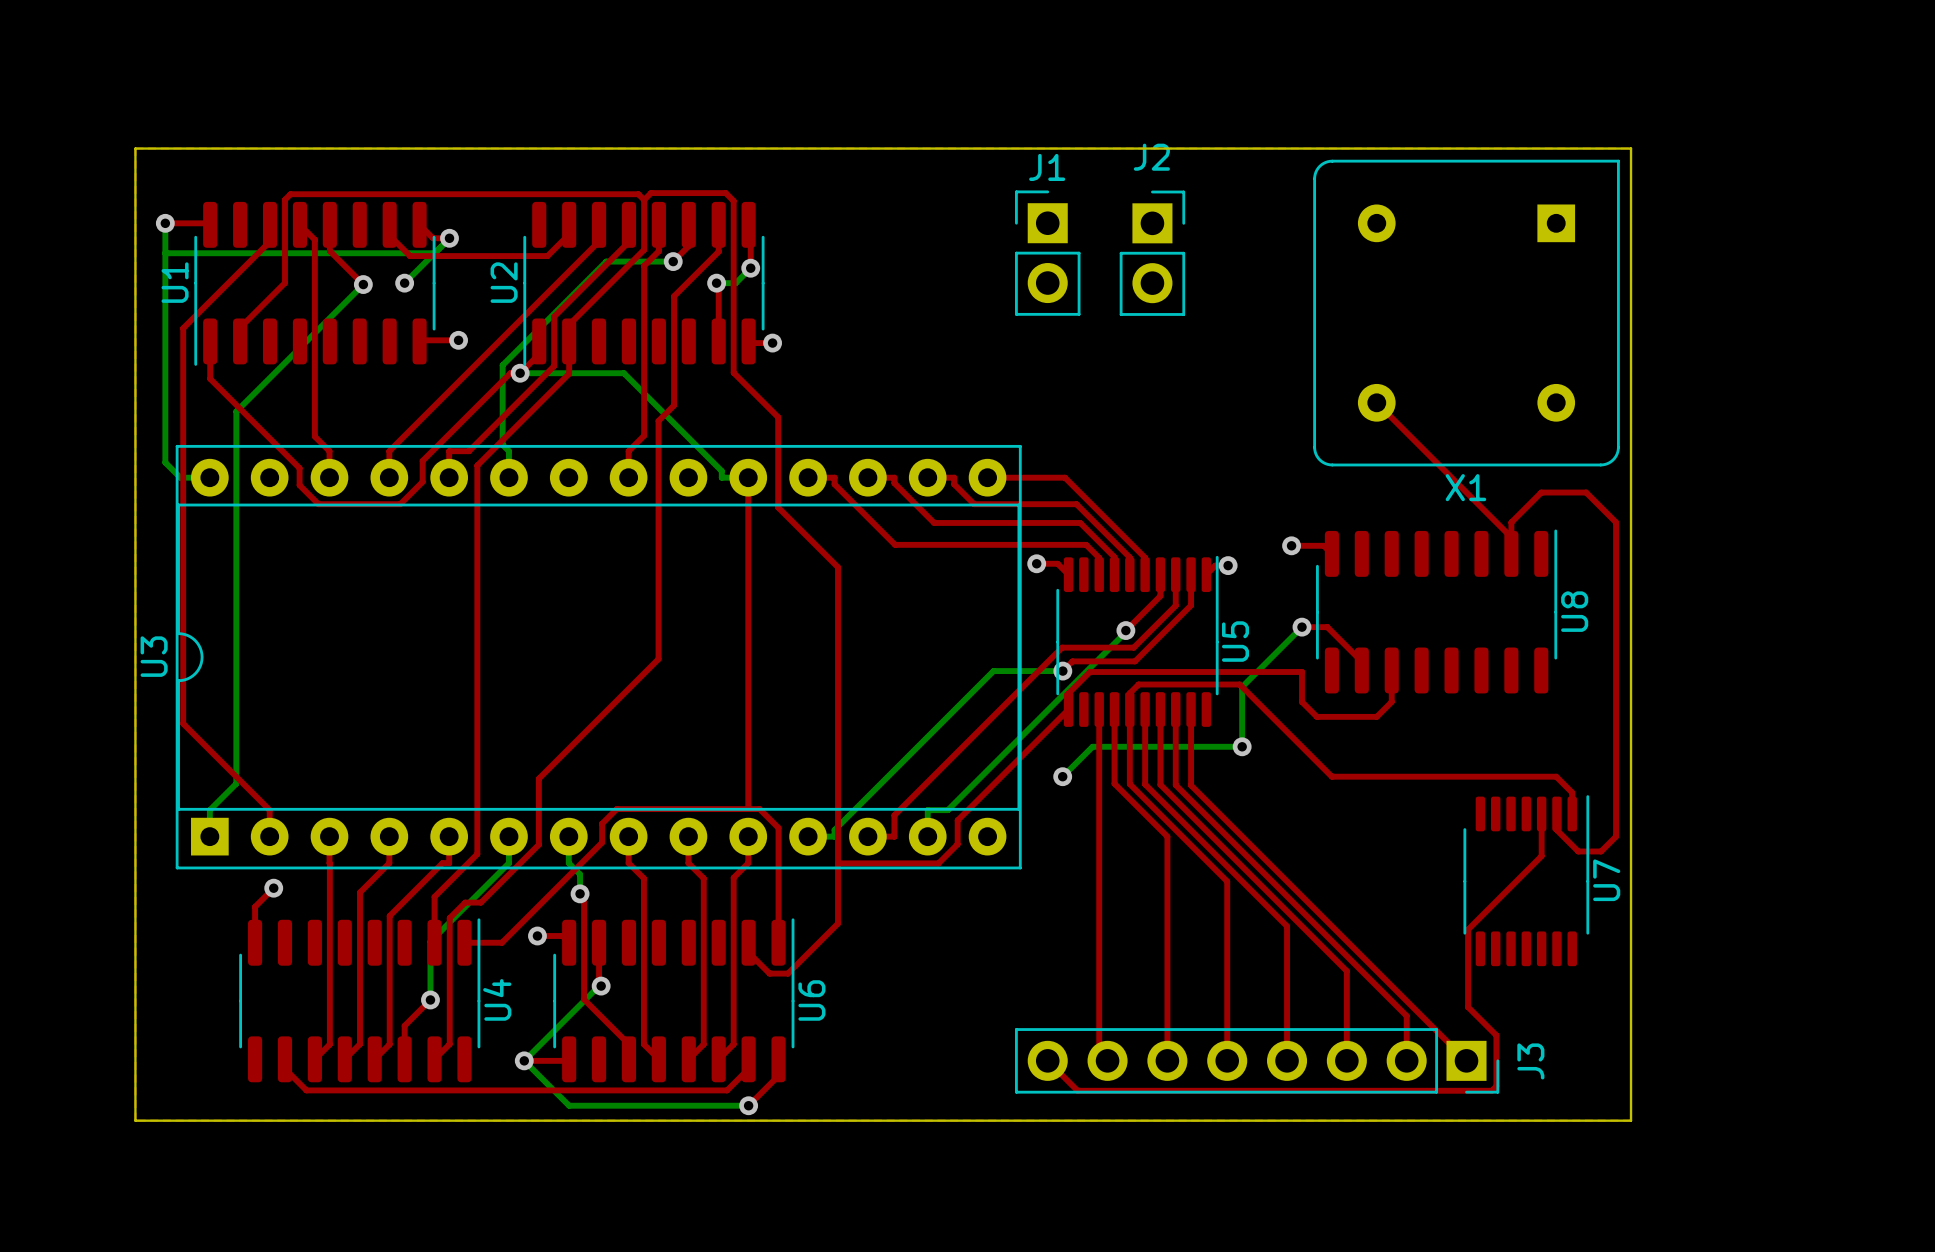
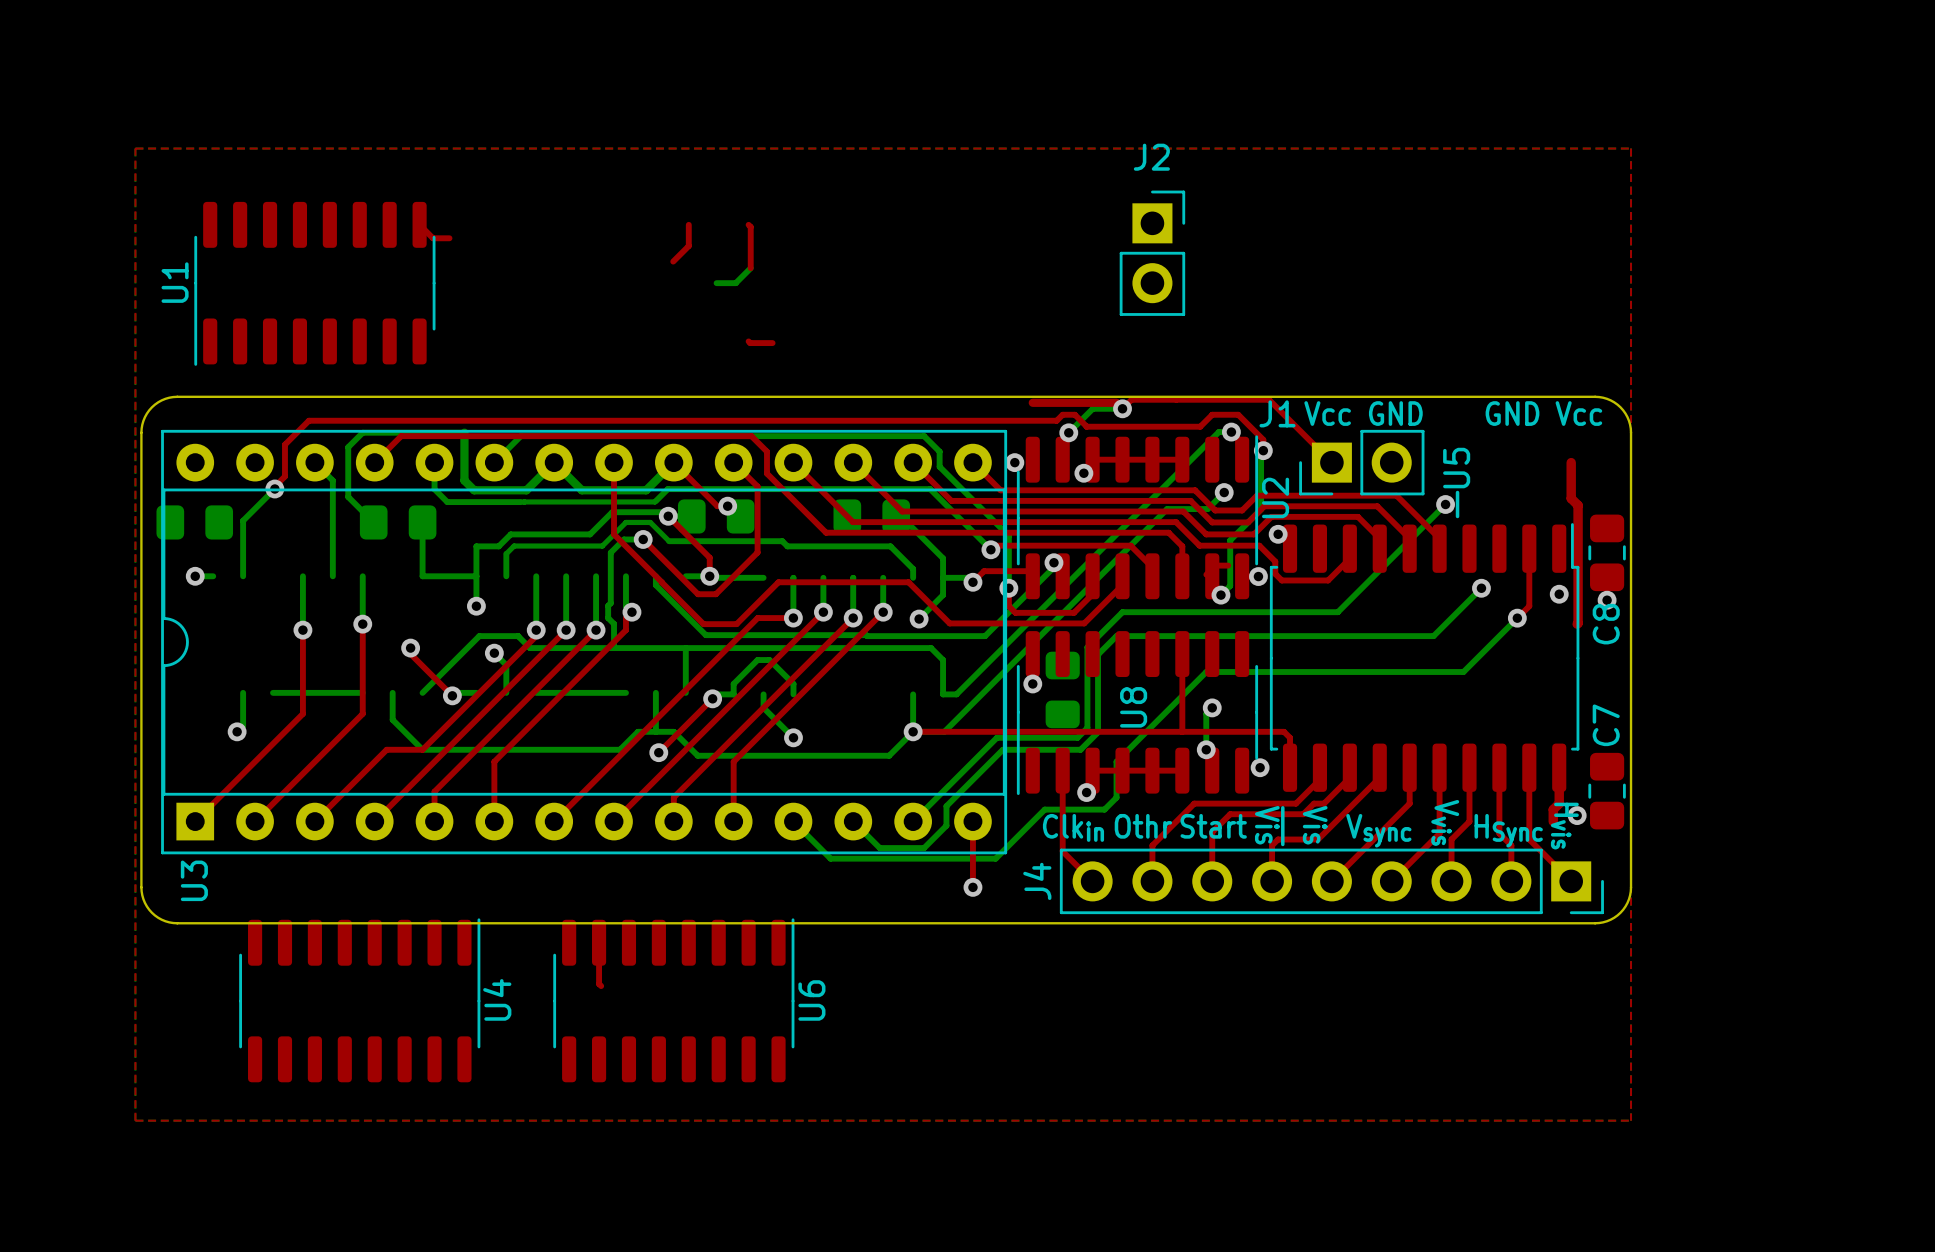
J1 name position: J1 (1047, 167) -> J1 (1277, 413)
top track: (644, 199) (644, 249) (569, 324) (569, 373) (477, 465) (477, 854) (434, 896) (434, 942) -> none
top track: (644, 199) (651, 193) (725, 193) (733, 200) (733, 372) (778, 417) (778, 507) (838, 567) (838, 923) (787, 973) (769, 973) (748, 952) (748, 942) -> none
top track: (644, 199) (638, 194) (290, 194) (284, 199) (284, 282) (240, 327) (240, 341) -> none
top track: (165, 223) (210, 224) -> none
bottom track: (165, 223) (165, 462) (180, 477) (209, 477) -> none
via: (165, 223) -> none
top track: (270, 224) (270, 241) (183, 328) (183, 723) (269, 810) (269, 836) -> none
top track: (299, 224) (314, 239) (314, 436) (329, 451) (329, 477) -> none
top track: (329, 224) (329, 251) (363, 284) -> none
top track: (389, 224) (389, 235) (410, 256) (547, 256) (569, 234) (569, 224) -> none
top track: (599, 224) (599, 241) (389, 451) (389, 477) -> none
top track: (628, 224) (628, 241) (554, 316) (554, 366) (469, 451) (449, 451) (449, 477) -> none
top track: (658, 224) (658, 251) (644, 265) (644, 435) (628, 451) (628, 477) -> none
top track: (718, 224) (718, 251) (674, 296) (674, 405) (658, 420) (658, 659) (538, 778) (538, 844) (480, 902) (465, 902) (449, 918) (449, 1044) (434, 1059) -> none
bottom track: (449, 238) (404, 283) -> none
via: (449, 238) -> none
bottom track: (165, 253) (434, 253) -> none
J1 rotation: 0° (1047, 253) -> 90° counterclockwise (1361, 462)
J1 position: (1047, 253) -> (1361, 462)
bottom track: (673, 261) (606, 261) (502, 365) (502, 444) (508, 451) (508, 477) -> none
via: (673, 261) -> none
via: (750, 268) -> none
via: (404, 283) -> none
U2 rotation: 0° (643, 283) -> 180° (1137, 517)
U2 position: (643, 283) -> (1137, 517)
top track: (716, 283) (718, 285) (718, 341) -> none
via: (716, 283) -> none
bottom track: (363, 284) (236, 411) (236, 783) (209, 810) (209, 836) -> none
via: (363, 284) -> none
X1: (1466, 313) -> none
top track: (458, 340) (419, 341) -> none
via: (458, 340) -> none
top track: (210, 341) (210, 378) (299, 468) (299, 485) (318, 504) (400, 504) (422, 481) (422, 460) (510, 373) (520, 373) (539, 354) (539, 341) -> none
via: (772, 343) -> none
bottom track: (520, 373) (623, 373) (721, 471) (721, 477) (748, 477) -> none
via: (520, 373) -> none
top track: none -> (1032, 402) (1116, 402) (1122, 408) (1131, 399) (1269, 399) (1331, 462)
top track: (1376, 402) (1511, 537) -> none
bottom track: none -> (1122, 408) (1092, 408) (1068, 432)
via: none -> (1122, 408)
text: none -> Vcc GND (1363, 413)
text: none -> GND Vcc (1543, 413)
top track: none -> (1086, 426) (1074, 414) (1062, 414) (1056, 420) (308, 420) (284, 444) (284, 476) (274, 486) (274, 488)
top track: none -> (1086, 426) (1200, 426) (1212, 414) (1238, 414) (1263, 439) (1263, 450)
via: none -> (1068, 432)
bottom track: none -> (1231, 432) (1218, 432) (956, 694) (943, 694) (943, 660) (931, 648) (530, 648) (518, 636)
via: none -> (1231, 432)
board edge: (1631, 432) (1631, 148) (135, 148) (135, 1120) (1631, 1120) (1631, 887) -> (1631, 432) (1627, 417) (1620, 407) (1606, 398) (1595, 396) (177, 396) (165, 398) (151, 407) (143, 420) (141, 432) (141, 887) (146, 906) (154, 915) (165, 921) (177, 923) (1595, 923) (1606, 921) (1620, 912) (1627, 902) (1631, 887)
bottom track: none -> (1263, 450) (1261, 452) (1261, 509) (1230, 540) (1230, 585) (1220, 595)
via: none -> (1263, 450)
top track: none -> (1182, 459) (1092, 459) (1092, 464) (1083, 473)
bottom track: none -> (314, 462) (332, 480) (332, 576)
top track: none -> (374, 462) (401, 436) (751, 436) (766, 451) (766, 473) (826, 532) (1168, 532) (1182, 546) (1182, 576)
bottom track: none -> (434, 462) (434, 489) (447, 502) (655, 501) (667, 489) (930, 489) (990, 549)
bottom track: none -> (494, 462) (520, 436) (924, 436) (939, 451) (939, 466) (1008, 535) (1008, 588)
top track: none -> (614, 462) (614, 534) (661, 582)
top track: none -> (673, 462) (717, 506) (727, 506)
bottom track: none -> (673, 462) (646, 490) (581, 490) (554, 462) (526, 490) (474, 490) (464, 480) (464, 432) (362, 432) (348, 447) (348, 496) (373, 522)
top track: none -> (733, 462) (757, 486) (757, 552) (715, 594) (697, 594) (643, 539)
top track: none -> (793, 462) (852, 522) (1176, 522) (1199, 545) (1259, 545) (1275, 561) (1275, 573) (1281, 580) (1328, 580) (1349, 558) (1349, 548)
top track: none -> (853, 462) (902, 511) (1183, 511) (1206, 534) (1253, 534) (1271, 516) (1358, 516) (1379, 538) (1379, 548)
top track: none -> (913, 462) (951, 500) (1190, 500) (1212, 522) (1248, 522) (1264, 506) (1377, 506) (1409, 538) (1409, 548)
top track: none -> (972, 462) (1000, 490) (1195, 490) (1215, 510) (1242, 510) (1256, 495) (1396, 495) (1439, 538) (1439, 548)
via: none -> (1014, 462)
top track: none -> (1571, 462) (1571, 498) (1578, 505) (1577, 624)
via: none -> (1083, 473)
top track: (748, 477) (748, 809) -> none
top track: (808, 477) (834, 477) (834, 484) (895, 544) (1086, 544) (1099, 557) (1099, 574) -> none
top track: (867, 477) (894, 477) (894, 483) (934, 522) (1080, 522) (1114, 557) (1114, 574) -> none
top track: (927, 477) (954, 477) (954, 484) (974, 504) (1076, 504) (1129, 557) (1129, 574) -> none
top track: (987, 477) (1065, 477) (1145, 557) (1145, 574) -> none
bottom track: none -> (274, 488) (243, 520) (243, 576)
via: none -> (274, 488)
bottom track: none -> (1224, 492) (1207, 509) (1167, 509) (944, 731) (913, 731)
via: none -> (1224, 492)
line: none -> (1457, 492) (1457, 516)
bottom track: none -> (1445, 504) (1337, 612) (1122, 612) (1087, 647) (1087, 727) (1077, 737) (996, 737) (913, 821)
via: none -> (1445, 504)
via: none -> (727, 506)
top track: none -> (668, 516) (709, 557) (709, 576)
via: none -> (668, 516)
bottom track: none -> (684, 516) (668, 516) (664, 512) (612, 512) (590, 534) (510, 534) (498, 546) (476, 546) (476, 606)
part: none -> (716, 516)
part: none -> (871, 516)
bottom track: none -> (901, 516) (943, 558) (943, 595) (919, 619)
part: none -> (194, 522)
part: none -> (398, 522)
bottom track: none -> (422, 522) (422, 576) (476, 576)
bottom track: none -> (643, 539) (623, 539) (610, 552) (610, 603) (608, 605) (608, 618) (614, 623) (614, 648)
via: none -> (643, 539)
top track: (1291, 545) (1323, 545) (1331, 553) -> none
via position: (1291, 545) -> (1278, 534)
top track: none -> (1529, 548) (1529, 606) (1517, 618)
top track: none -> (990, 549) (995, 545) (1130, 545) (1152, 567) (1152, 576)
via: none -> (990, 549)
C8: none -> (1607, 552)
top track: (1511, 553) (1511, 522) (1541, 492) (1586, 492) (1616, 522) (1616, 836) (1601, 851) (1578, 851) (1556, 830) (1556, 813) -> none
U5 footprint: [1056, 555, 1219, 727] -> [1269, 523, 1580, 792]
bottom track: none -> (1053, 562) (1053, 567) (985, 636) (705, 635) (655, 585) (655, 576)
top track: (1036, 563) (1057, 563) (1068, 574) -> none
via position: (1036, 563) -> (1053, 562)
via: (1228, 565) -> none
top track: (1160, 574) (1160, 596) (1125, 630) -> none
top track: (1175, 574) (1175, 605) (1133, 647) (1062, 647) (894, 815) (894, 836) (867, 836) -> none
top track: (1191, 574) (1191, 605) (1135, 661) (1072, 661) (1062, 671) -> none
bottom track: none -> (195, 576) (213, 576)
via: none -> (195, 576)
bottom track: none -> (302, 576) (302, 630)
bottom track: none -> (362, 576) (362, 624)
bottom track: none -> (506, 576) (506, 553) (514, 546) (602, 546) (625, 522) (650, 522) (669, 541) (782, 541) (787, 546) (890, 546) (913, 568) (913, 577)
bottom track: none -> (536, 576) (536, 630)
bottom track: none -> (566, 576) (566, 630)
bottom track: none -> (596, 576) (596, 630)
bottom track: none -> (625, 576) (625, 606) (631, 612)
bottom track: none -> (685, 576) (763, 577)
via: none -> (709, 576)
top track: none -> (1032, 576) (1027, 571) (984, 571) (972, 582)
top track: none -> (1092, 576) (1092, 594) (1074, 612) (1015, 612) (1008, 606) (1008, 588)
top track: none -> (1122, 576) (1122, 585) (1084, 623) (949, 623) (908, 582) (778, 582) (736, 624) (703, 624) (661, 582)
via: none -> (1258, 576)
bottom track: none -> (793, 577) (793, 618)
bottom track: none -> (823, 577) (823, 612)
bottom track: none -> (853, 577) (853, 618)
bottom track: none -> (883, 577) (883, 612)
bottom track: none -> (943, 577) (968, 577) (972, 582)
via: none -> (972, 582)
via: none -> (1008, 588)
bottom track: none -> (1481, 588) (1433, 636) (1116, 636) (1098, 654) (1098, 732) (1080, 749) (1002, 749) (946, 806) (946, 825) (924, 848) (879, 848) (853, 821)
via: none -> (1481, 588)
via: none -> (1559, 594)
via: none -> (1220, 595)
via: none -> (1607, 600)
via: none -> (476, 606)
U8 rotation: 0° (1436, 611) -> 180° (1137, 713)
U8 position: (1436, 611) -> (1137, 713)
U8 name position: U8 (1574, 611) -> U8 (1133, 707)
top track: none -> (631, 612) (625, 618) (625, 630) (494, 761) (494, 821)
via: none -> (631, 612)
top track: none -> (823, 612) (614, 821)
via: none -> (823, 612)
top track: none -> (883, 612) (733, 761) (733, 821)
via: none -> (883, 612)
top track: none -> (793, 618) (757, 618) (554, 821)
via: none -> (793, 618)
top track: none -> (853, 618) (673, 797) (673, 821)
via: none -> (853, 618)
bottom track: none -> (1517, 618) (1463, 672) (1206, 672) (1116, 761) (1116, 797) (1104, 809) (1044, 809) (995, 858) (830, 858) (793, 821)
via: none -> (1517, 618)
via: none -> (919, 619)
top track: none -> (362, 624) (362, 713) (255, 821)
via: none -> (362, 624)
top track: (1301, 627) (1327, 627) (1361, 661) (1361, 670) -> none
bottom track: (1301, 627) (1242, 686) (1242, 746) (1092, 746) (1062, 776) -> none
via: (1301, 627) -> none
top track: none -> (302, 630) (302, 713) (195, 821)
via: none -> (302, 630)
top track: none -> (536, 630) (536, 636) (422, 749) (386, 749) (314, 821)
via: none -> (536, 630)
top track: none -> (566, 630) (374, 821)
via: none -> (566, 630)
top track: none -> (596, 630) (434, 791) (434, 821)
via: none -> (596, 630)
bottom track: (1125, 630) (947, 810) (927, 810) (927, 836) -> none
via: (1125, 630) -> none
bottom track: none -> (518, 636) (479, 636) (422, 692)
U5 name position: U5 (1235, 641) -> U5 (1456, 468)
top track: none -> (410, 648) (410, 654) (452, 695)
via: none -> (410, 648)
bottom track: none -> (685, 648) (685, 692)
bottom track: none -> (494, 653) (506, 665) (506, 692)
via: none -> (494, 653)
top track: none -> (1182, 654) (1182, 731)
U3 name position: U3 (154, 656) -> U3 (194, 880)
U3 position: (598, 657) -> (584, 642)
top track: (1391, 670) (1391, 701) (1376, 716) (1316, 716) (1301, 701) (1301, 672) (1089, 672) (1068, 693) (1068, 709) (957, 820) (957, 844) (938, 863) (838, 863) -> none
bottom track: (1062, 671) (993, 671) (834, 830) (834, 836) (808, 836) -> none
via position: (1062, 671) -> (1032, 683)
part: none -> (1062, 689)
bottom track: none -> (243, 692) (243, 725) (237, 731)
bottom track: none -> (273, 692) (362, 692)
bottom track: none -> (392, 692) (392, 719) (422, 749) (620, 749) (637, 731) (673, 731) (697, 755) (889, 755) (913, 731)
bottom track: none -> (455, 692) (476, 692)
bottom track: none -> (536, 692) (625, 692)
bottom track: none -> (655, 692) (655, 731)
bottom track: none -> (763, 694) (763, 707) (793, 737)
bottom track: none -> (793, 694) (793, 683) (769, 660) (757, 660) (733, 683) (733, 694) (717, 694) (712, 698)
bottom track: none -> (913, 694) (913, 731)
via: none -> (452, 695)
top track: none -> (712, 698) (658, 752)
via: none -> (712, 698)
bottom track: none -> (1212, 707) (1206, 713) (1206, 749)
via: none -> (1212, 707)
top track: (1099, 709) (1099, 1052) (1107, 1060) -> none
top track: (1114, 709) (1114, 783) (1167, 836) (1167, 1060) -> none
top track: (1145, 709) (1145, 784) (1287, 926) (1287, 1060) -> none
top track: (1160, 709) (1160, 784) (1346, 971) (1346, 1060) -> none
top track: (1175, 709) (1175, 785) (1406, 1016) (1406, 1060) -> none
top track: (1191, 709) (1191, 785) (1466, 1060) -> none
via: none -> (237, 731)
top track: none -> (913, 731) (1284, 731) (1290, 737) (1290, 767)
via: none -> (913, 731)
via: none -> (793, 737)
via: (1242, 746) -> none
via: none -> (1206, 749)
via: none -> (658, 752)
via: none -> (1260, 767)
top track: none -> (1319, 767) (1319, 779) (1296, 803) (1194, 803) (1152, 845) (1152, 881)
top track: none -> (1349, 767) (1349, 777) (1324, 803) (1313, 803) (1303, 814) (1230, 814) (1212, 832) (1212, 881)
top track: none -> (1379, 767) (1379, 777) (1318, 839) (1278, 839) (1272, 845) (1272, 881)
top track: none -> (1409, 767) (1409, 803) (1331, 881)
top track: none -> (1439, 767) (1439, 833) (1391, 881)
top track: none -> (1469, 767) (1469, 821) (1451, 839) (1451, 881)
top track: none -> (1499, 767) (1499, 833) (1511, 845) (1511, 881)
top track: none -> (1529, 767) (1529, 839) (1571, 881)
top track: none -> (1559, 767) (1559, 803) (1553, 809) (1553, 821)
top track: none -> (1062, 770) (1062, 851) (1092, 881)
top track: none -> (1182, 770) (1092, 770) (1092, 786) (1086, 792)
via position: (1062, 776) -> (1086, 792)
C7: none -> (1607, 791)
top track: (1541, 813) (1541, 856) (1468, 929) (1468, 1007) (1496, 1035) (1496, 1086) (1491, 1090) (1077, 1090) (1047, 1060) -> none
top track: (1572, 813) (1572, 792) (1556, 776) (1331, 776) (1239, 684) (1138, 684) (1129, 693) (1129, 784) (1227, 881) (1227, 1060) -> none
via: none -> (1577, 815)
top track: none -> (972, 821) (972, 887)
text: none -> Vvis (1445, 822)
text: none -> Vis (1315, 825)
text: none -> Othr (1143, 826)
text: none -> Start (1213, 826)
text: none -> ~{Vis} (1269, 826)
text: none -> Hvis (1564, 826)
text: none -> Clkin (1073, 827)
text: none -> Vsync (1378, 830)
text: none -> HSync (1508, 830)
top track: (329, 836) (329, 1044) (314, 1059) -> none
top track: (389, 836) (389, 863) (359, 892) (359, 1044) (344, 1059) -> none
top track: (449, 836) (449, 863) (442, 863) (389, 915) (389, 1044) (374, 1059) -> none
bottom track: (508, 836) (508, 863) (430, 941) (430, 999) -> none
bottom track: (568, 836) (568, 863) (580, 874) (580, 893) -> none
top track: (628, 836) (628, 863) (643, 878) (643, 1044) (658, 1059) -> none
top track: (688, 836) (688, 863) (703, 878) (703, 1044) (688, 1059) -> none
top track: (748, 836) (748, 863) (733, 877) (733, 1044) (718, 1059) -> none
U7: (1526, 880) -> none
J4: none -> (1331, 881)
via: none -> (972, 887)
top track: (273, 888) (255, 906) (255, 942) -> none
via: (273, 888) -> none
top track: (580, 893) (584, 897) (584, 999) (628, 1044) (628, 1059) -> none
via: (580, 893) -> none
top track: (537, 935) (562, 935) (569, 942) -> none
via: (537, 935) -> none
top track: (464, 942) (501, 942) (602, 842) (602, 823) (616, 809) (759, 809) (778, 827) (778, 942) -> none
bottom track: (601, 986) (524, 1060) (569, 1105) (748, 1105) -> none
via: (601, 986) -> none
top track: (430, 999) (404, 1025) (404, 1059) -> none
via: (430, 999) -> none
top track: (284, 1059) (284, 1068) (306, 1090) (727, 1090) (748, 1068) (748, 1059) -> none
top track: (569, 1059) (524, 1060) -> none
top track: (778, 1059) (778, 1075) (748, 1105) -> none
via: (524, 1060) -> none
J3: (1257, 1060) -> none
via: (748, 1105) -> none

